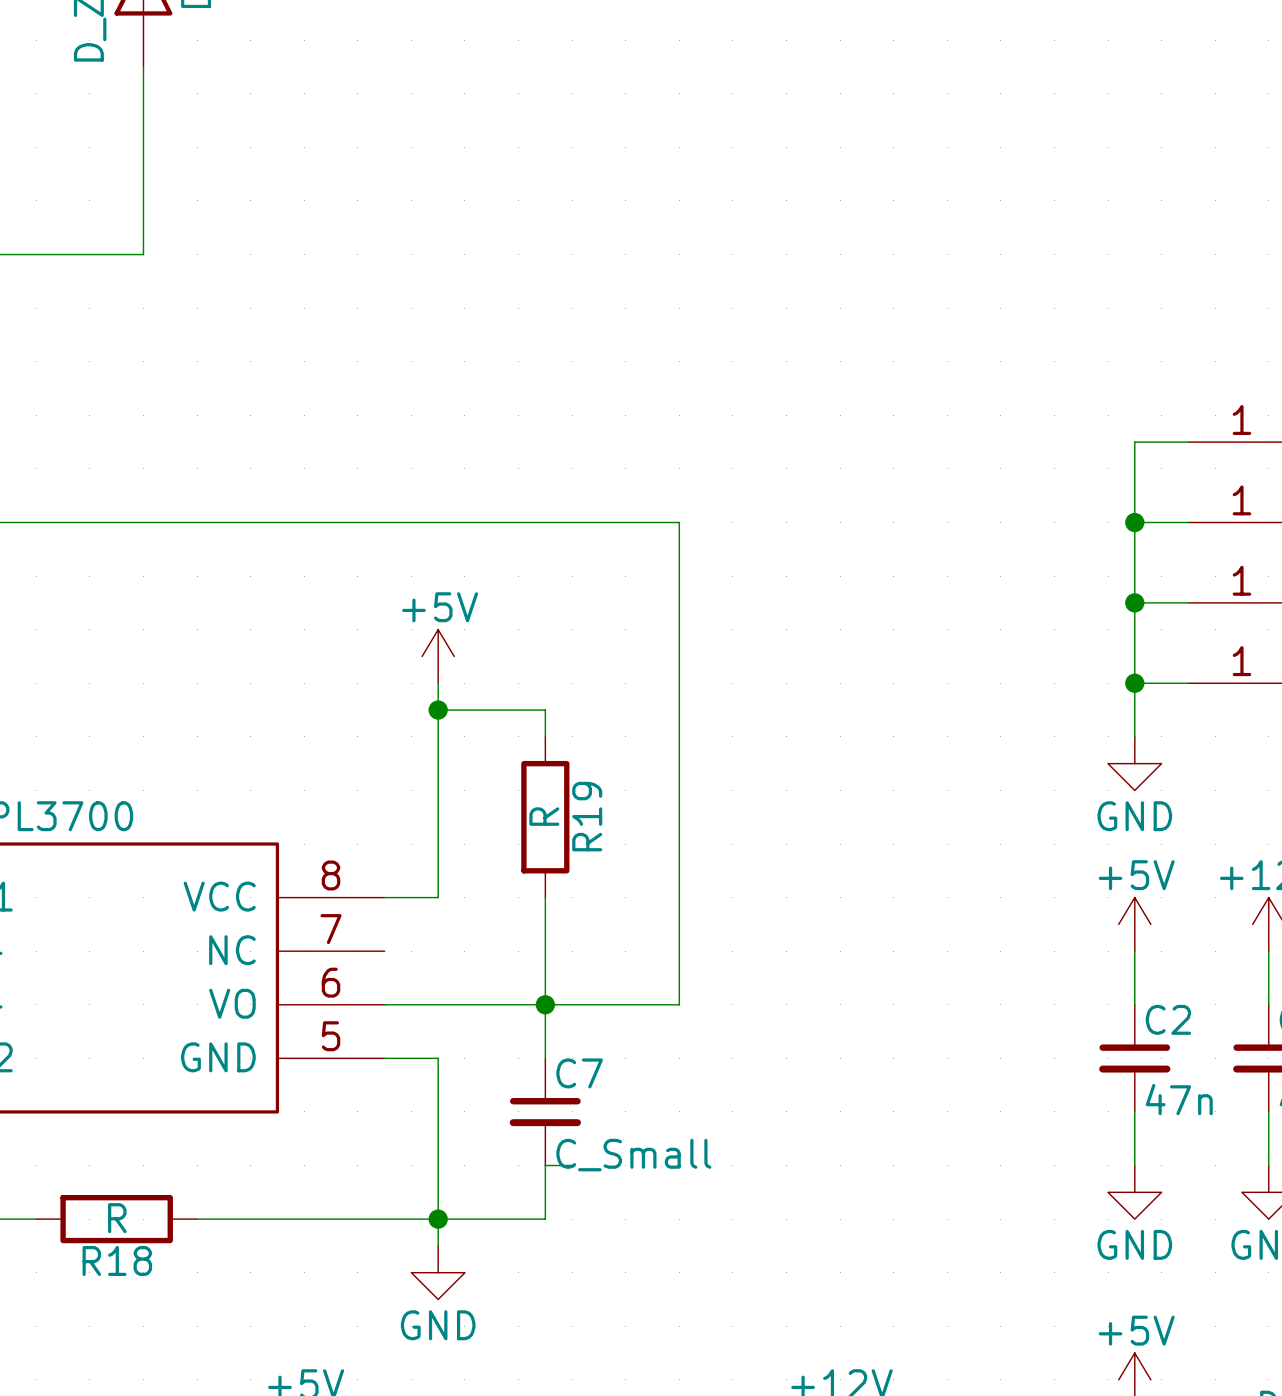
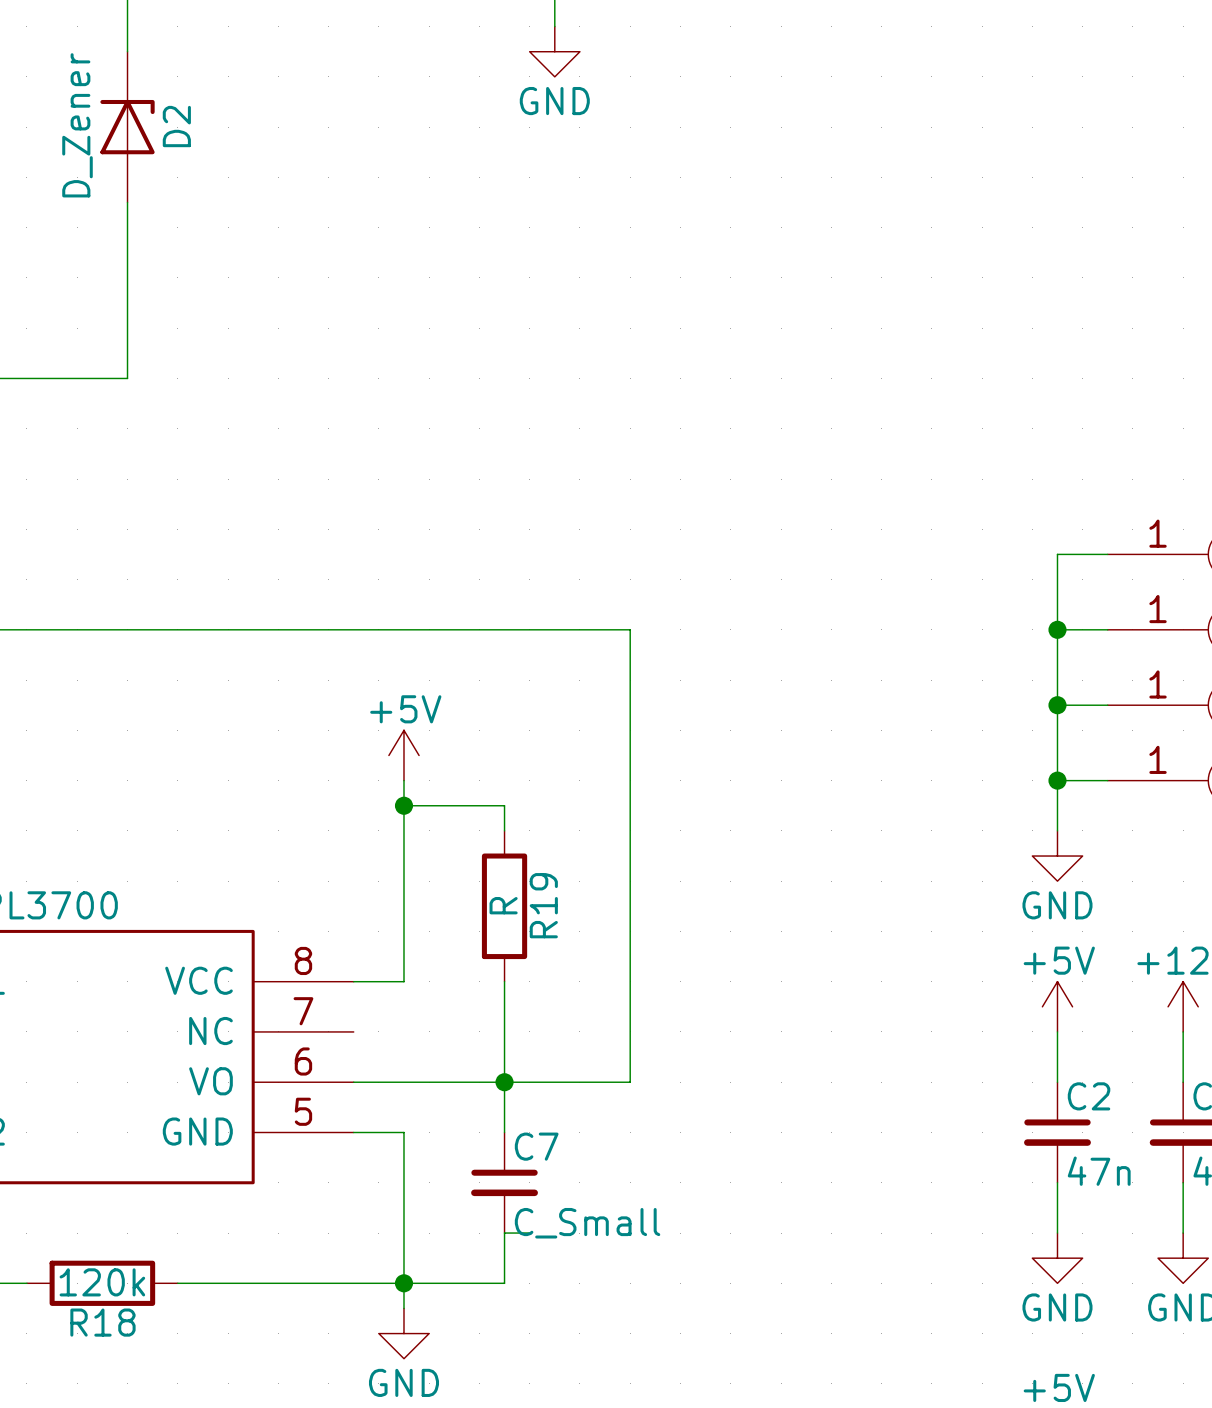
R18 value: R (117, 1218) -> 120k (102, 1282)

